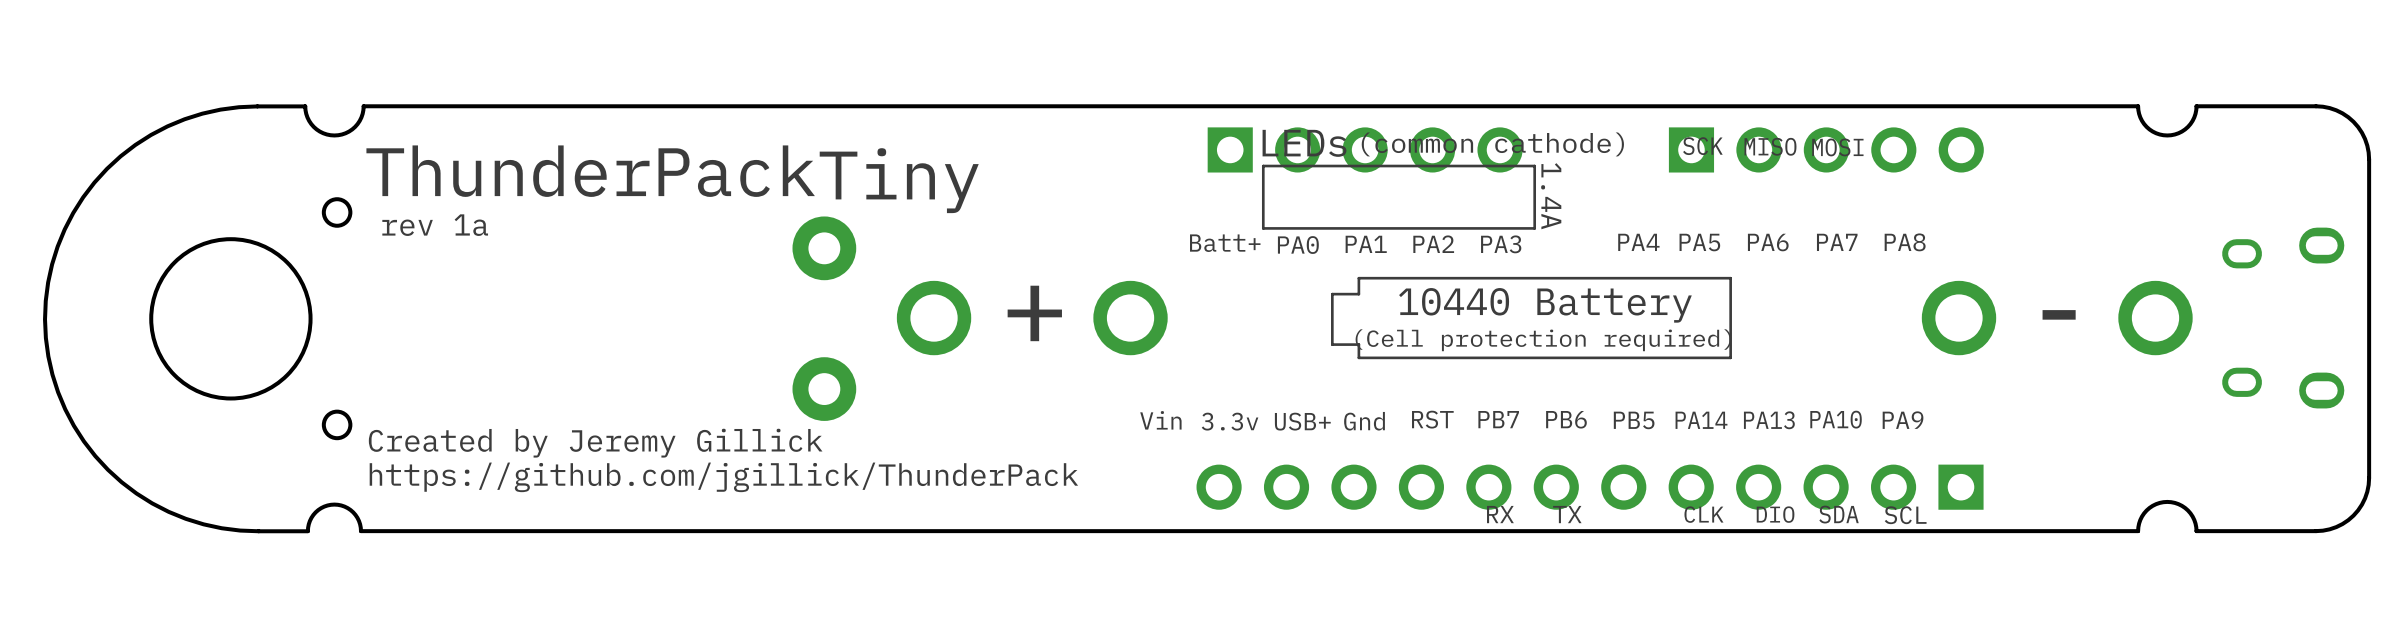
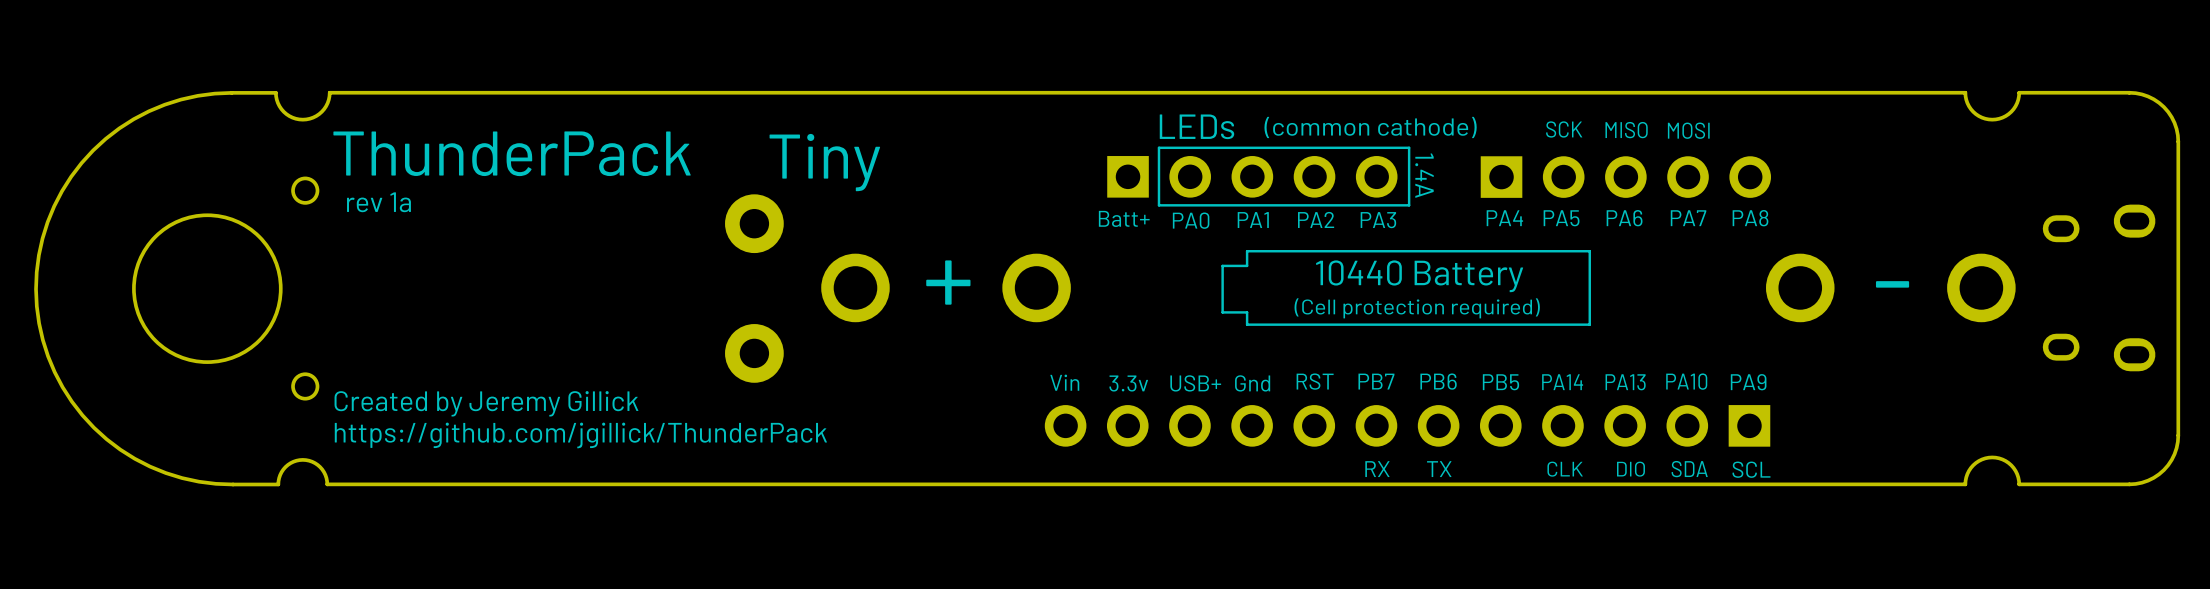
part position: (1365, 149) -> (1252, 176)
part position: (1826, 149) -> (1625, 177)
part position: (1590, 487) -> (1407, 425)

